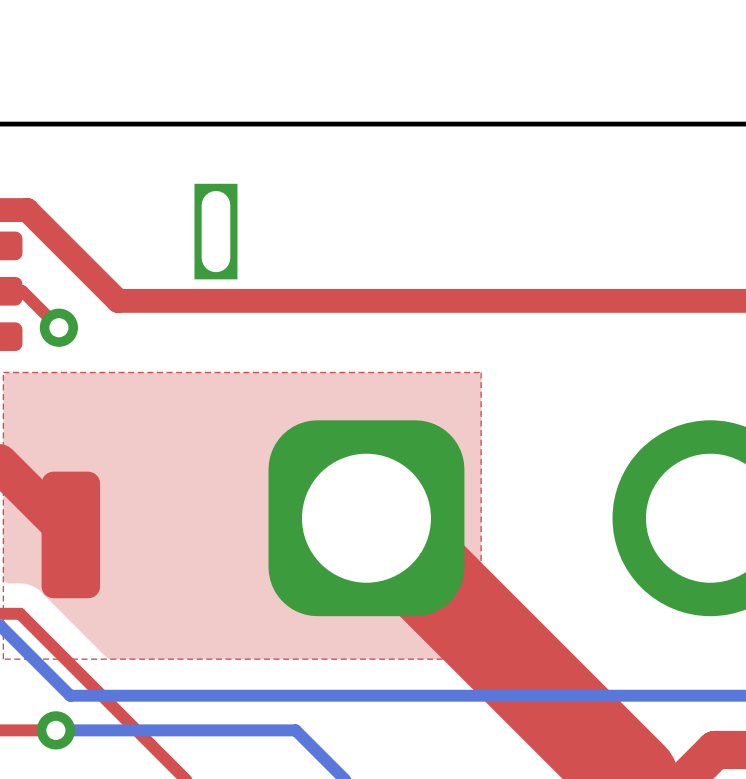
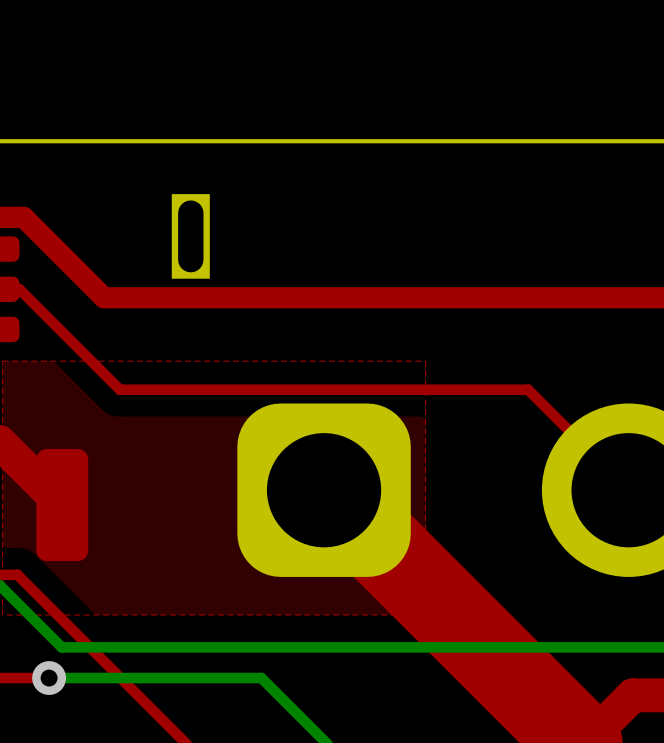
top track: none -> (51, 321) (119, 389) (528, 389) (628, 490)
via: (58, 327) -> none

